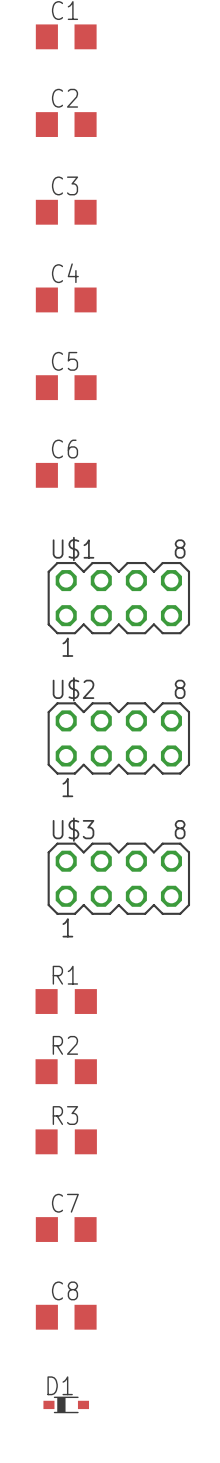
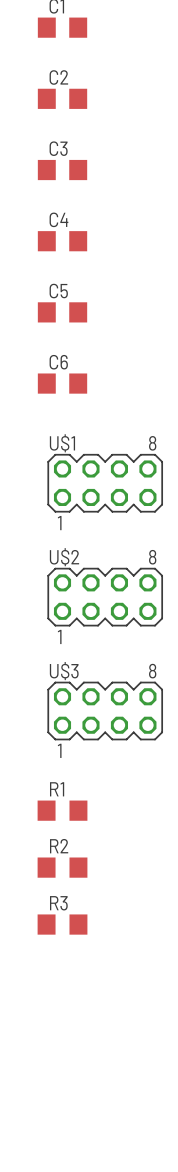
C7: (66, 1229) -> none
C8: (66, 1317) -> none
D1: (66, 1404) -> none

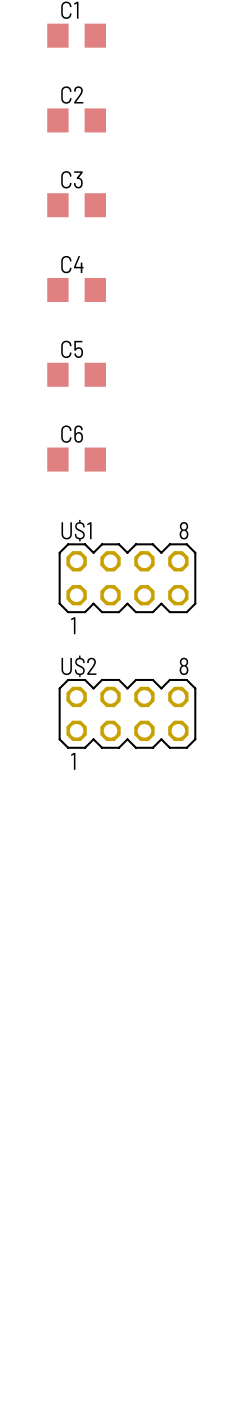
U$3: (105, 711) -> none
R1: (62, 810) -> none
R2: (62, 867) -> none
R3: (62, 924) -> none

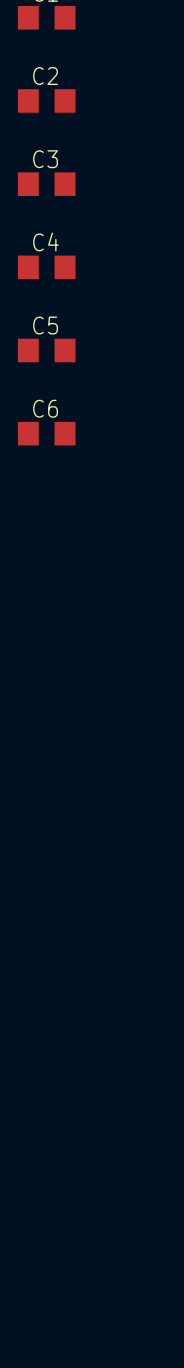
U$1: (127, 578) -> none
U$2: (127, 713) -> none

